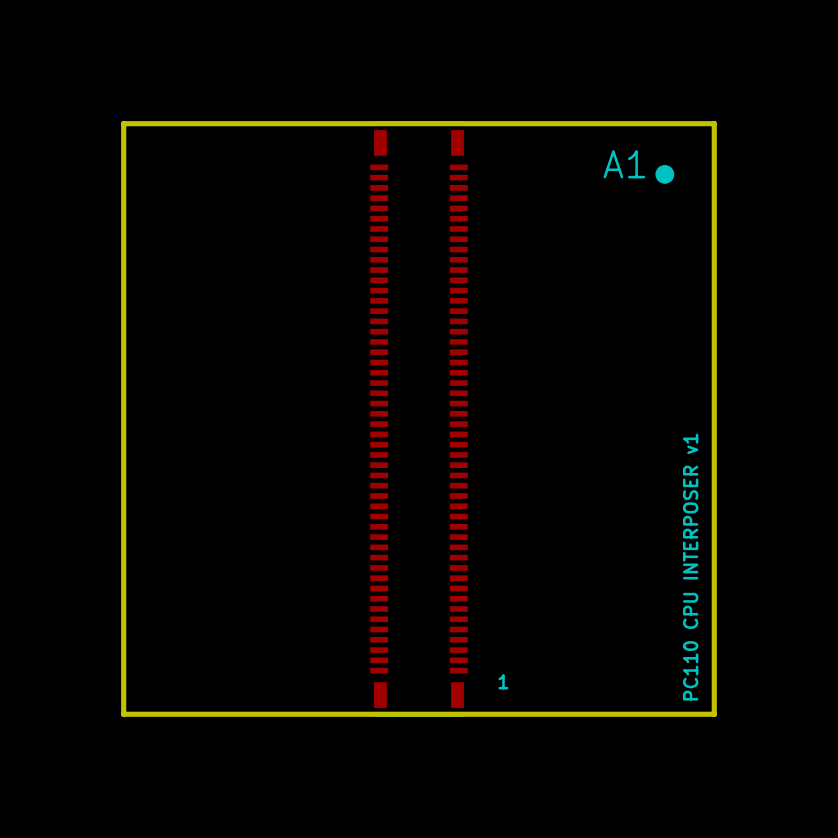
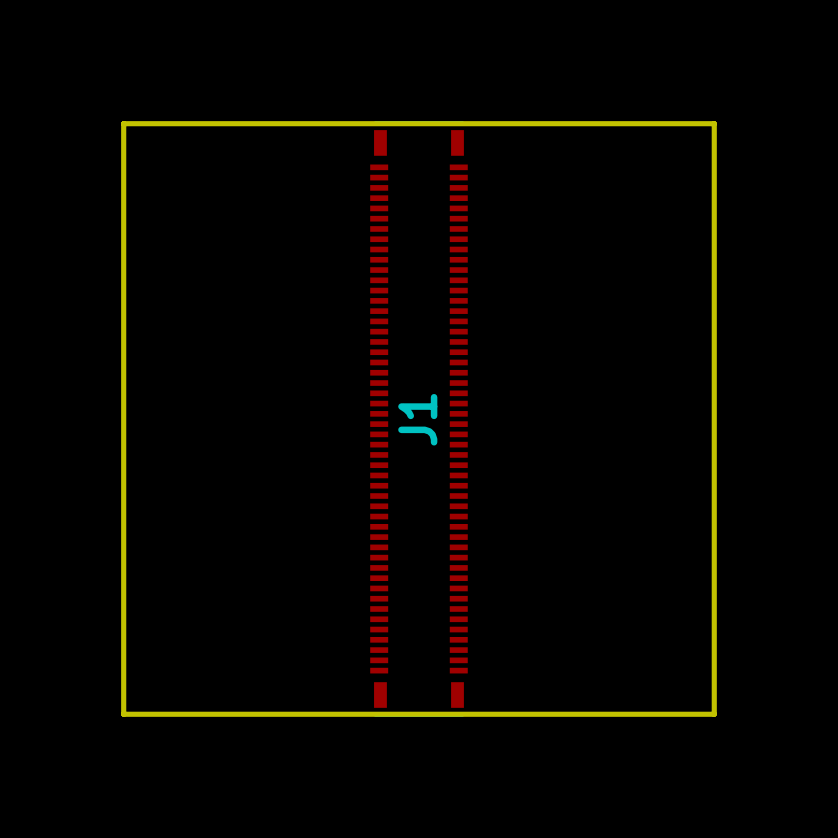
text: A1 (624, 164) -> none
drawing: [655, 165, 675, 184] -> none
J1 name: none -> J1 (417, 419)
text: PC110 CPU INTERPOSER v1 (690, 567) -> none
text: 1 (503, 681) -> none

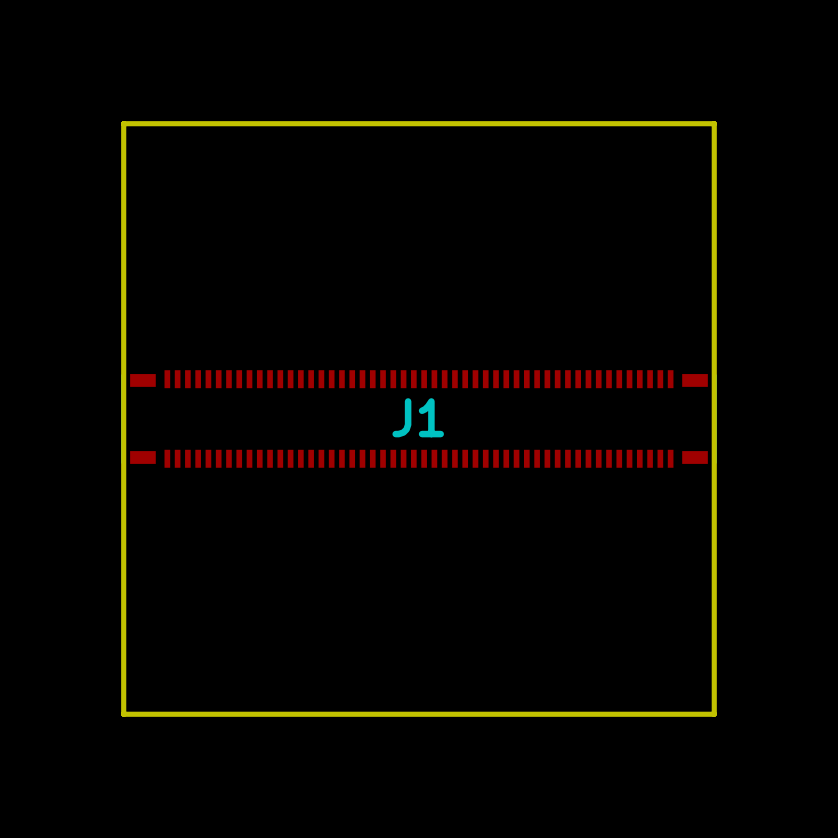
J1 rotation: 0° (418, 418) -> 90° clockwise (418, 418)

